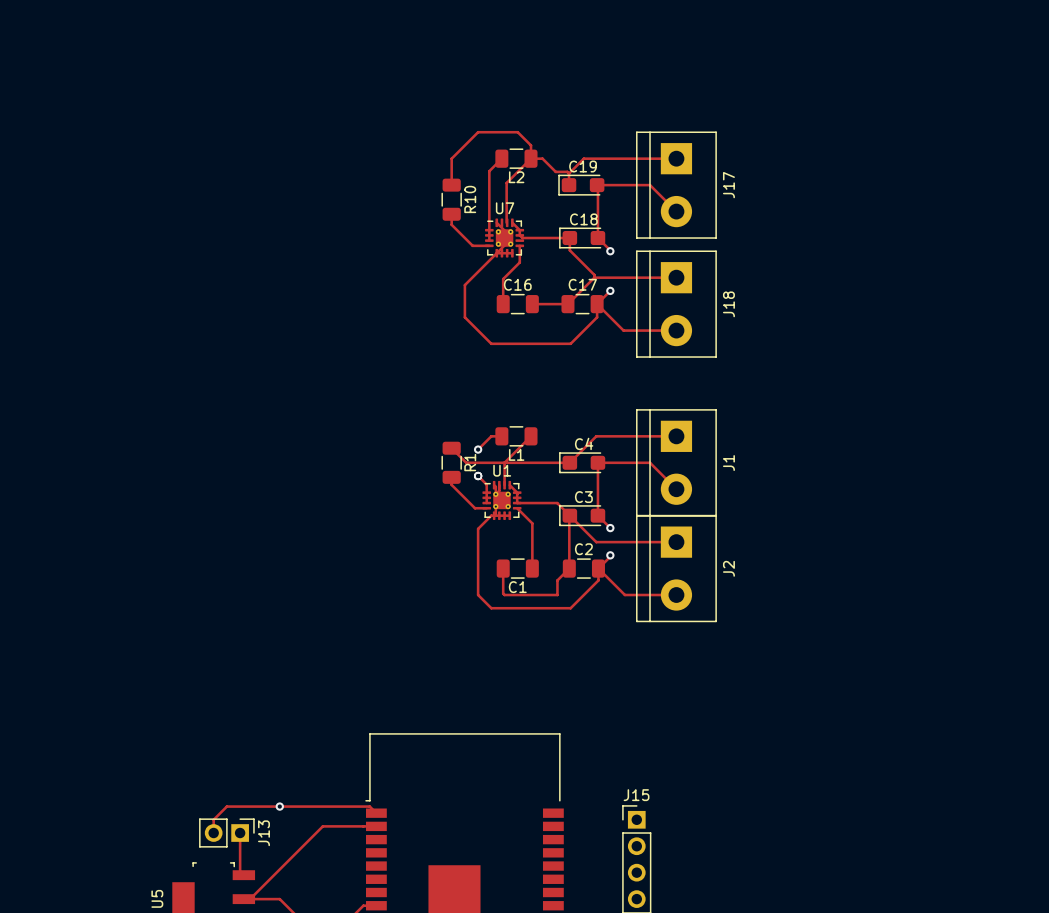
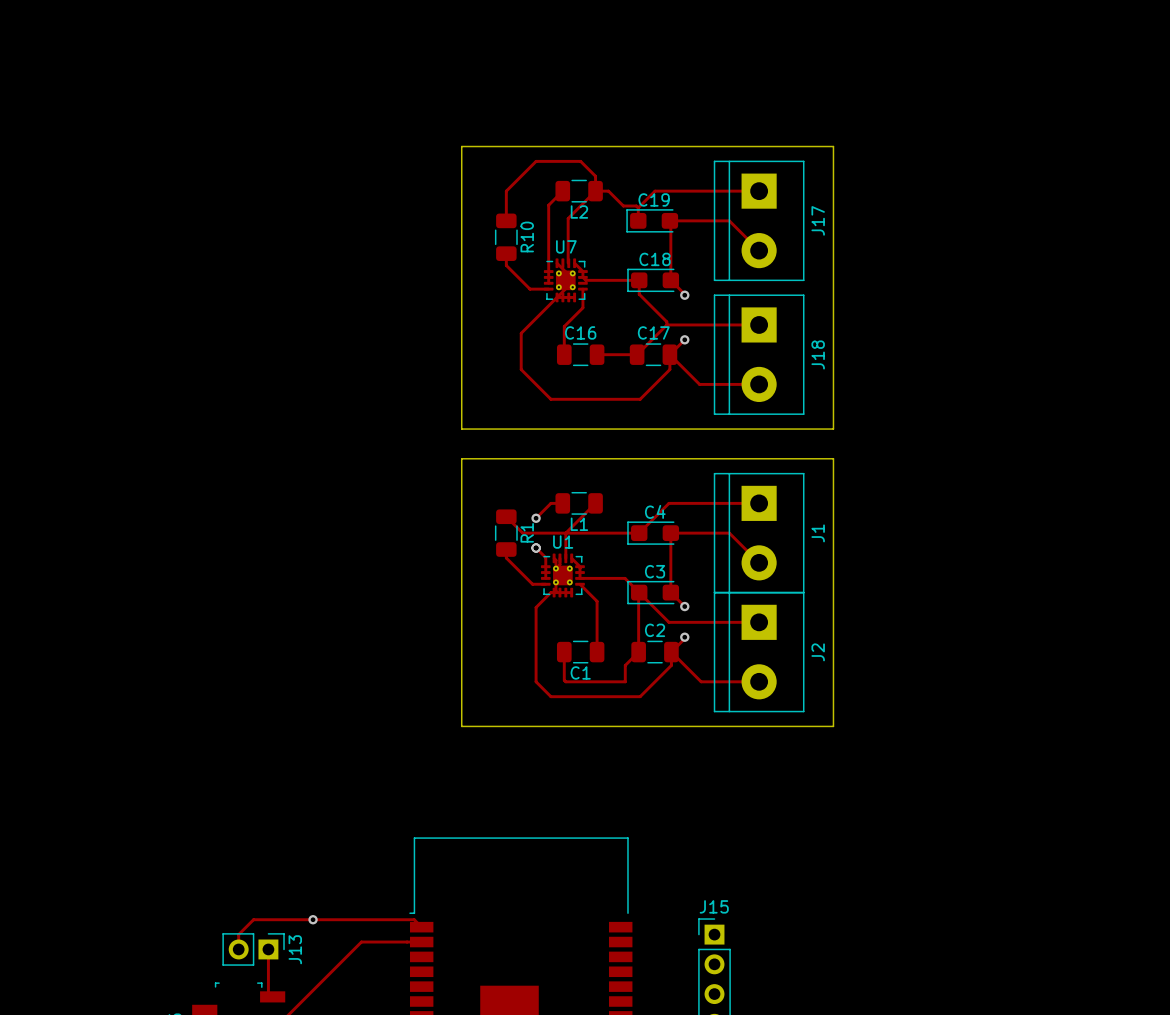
board edge: none -> (461, 146) (461, 429) (833, 429) (833, 146) (461, 146)
board edge: none -> (461, 458) (461, 726) (833, 726) (833, 458) (461, 458)

